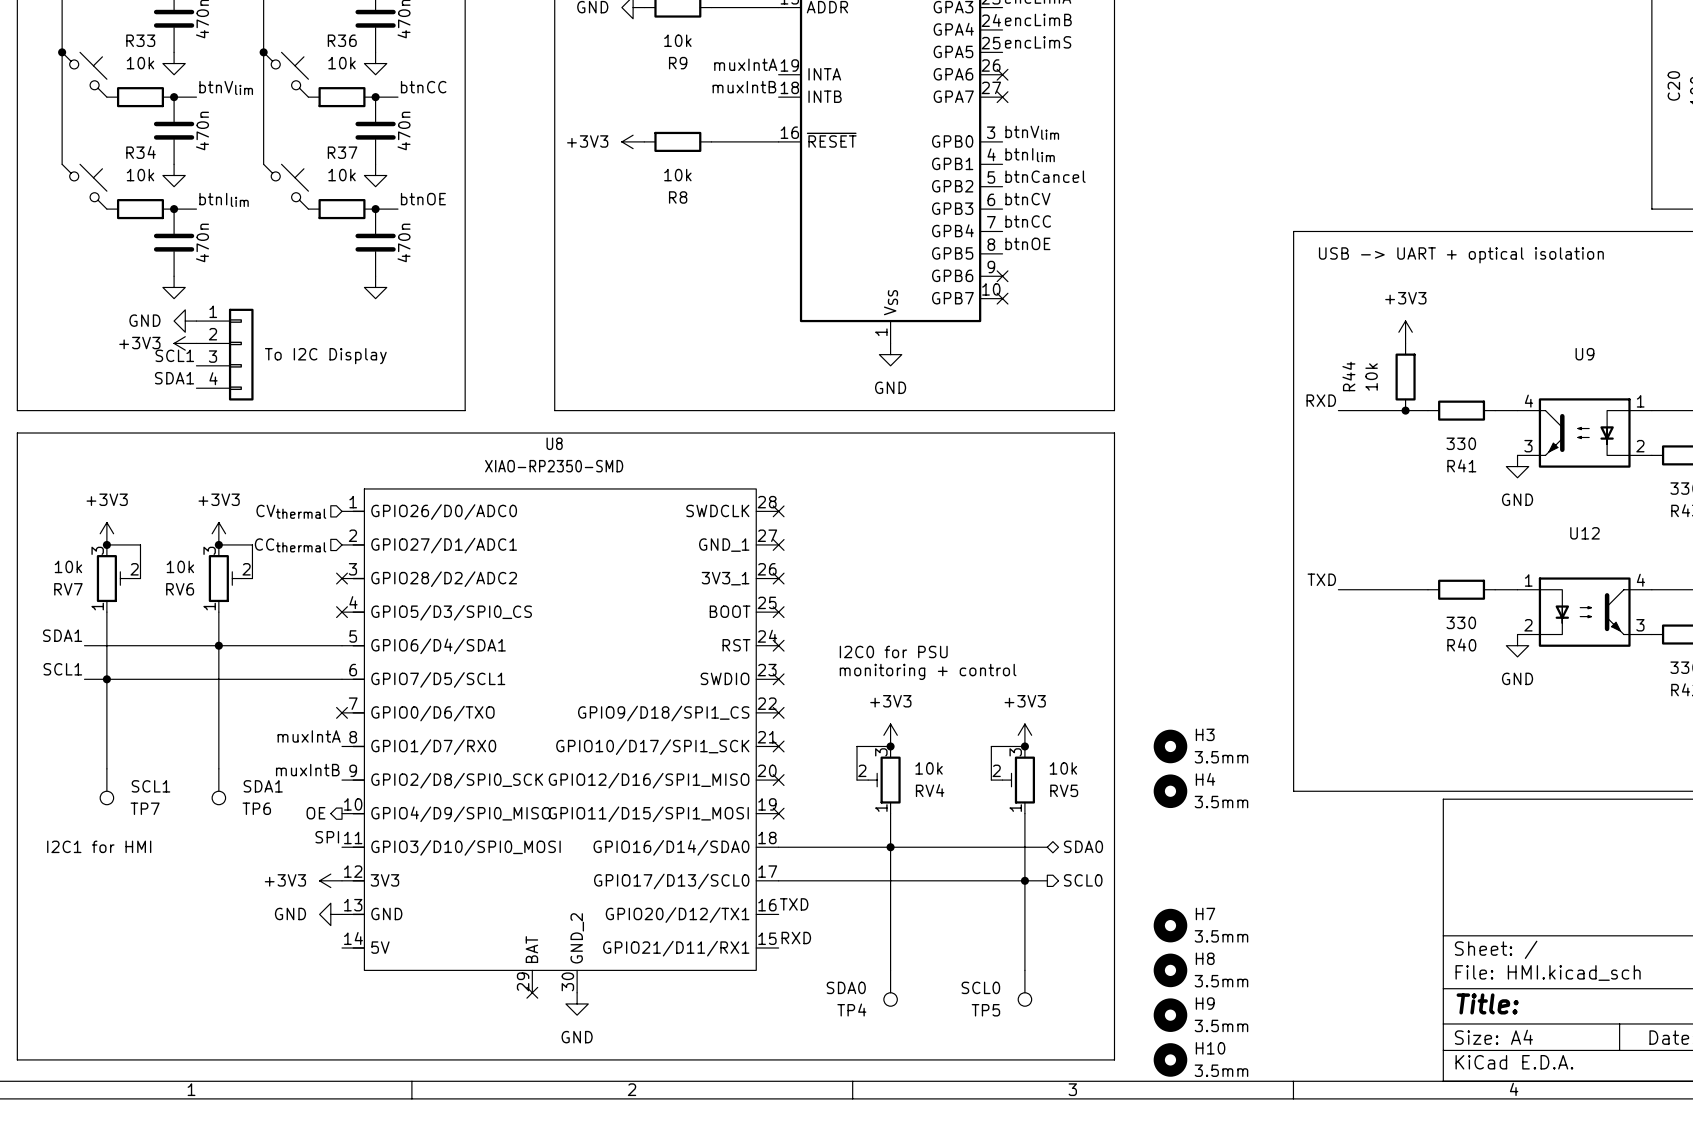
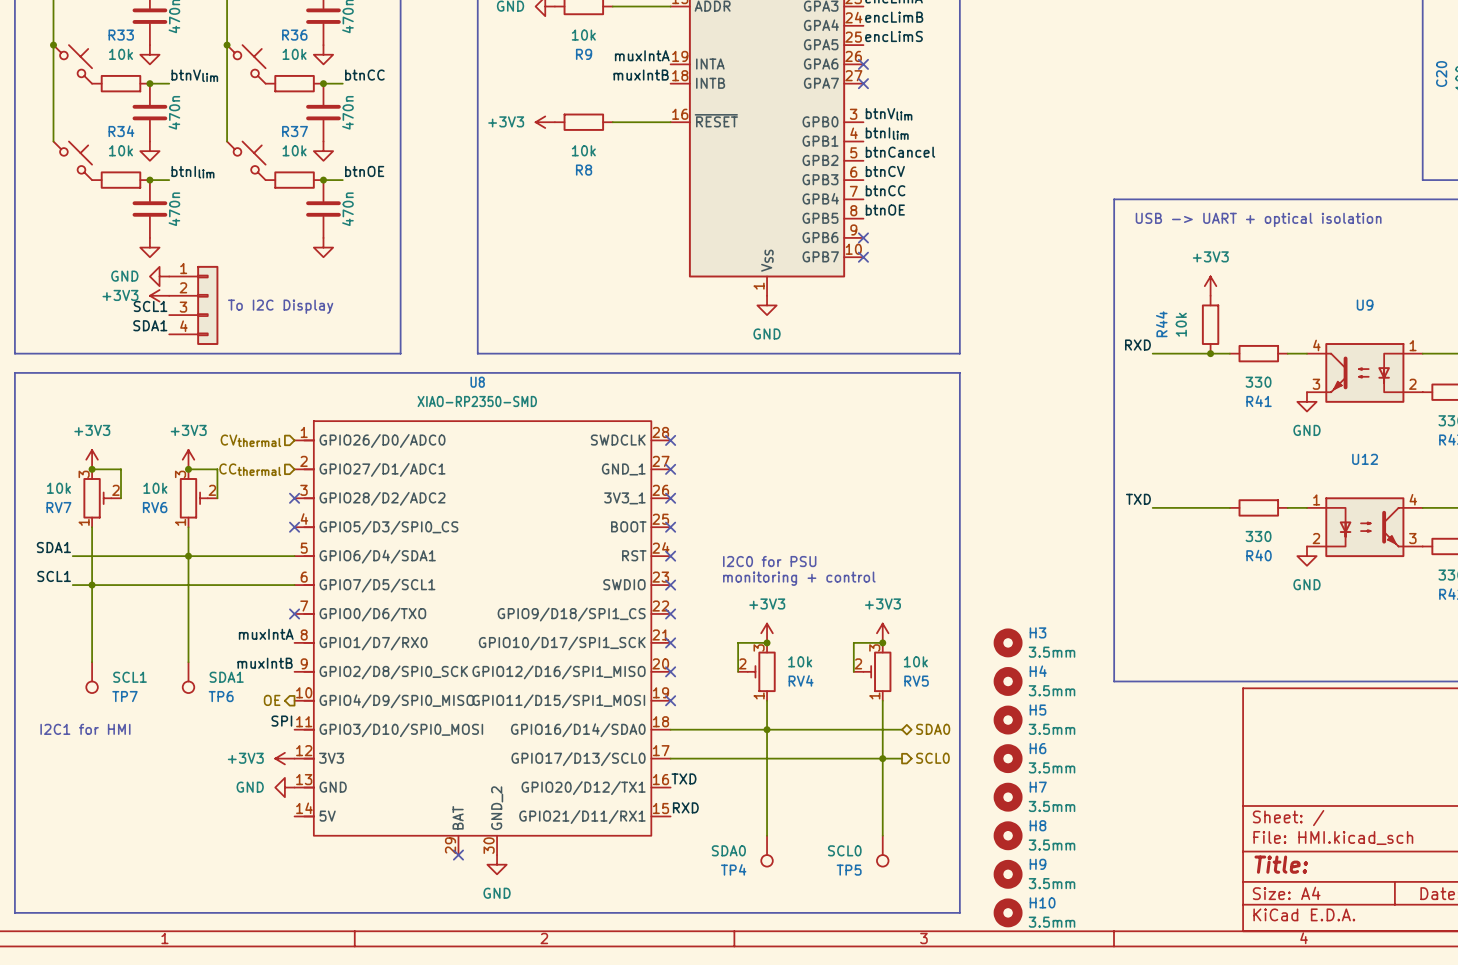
H5: none -> 3.5mm (1008, 720)
H6: none -> 3.5mm (1008, 758)

